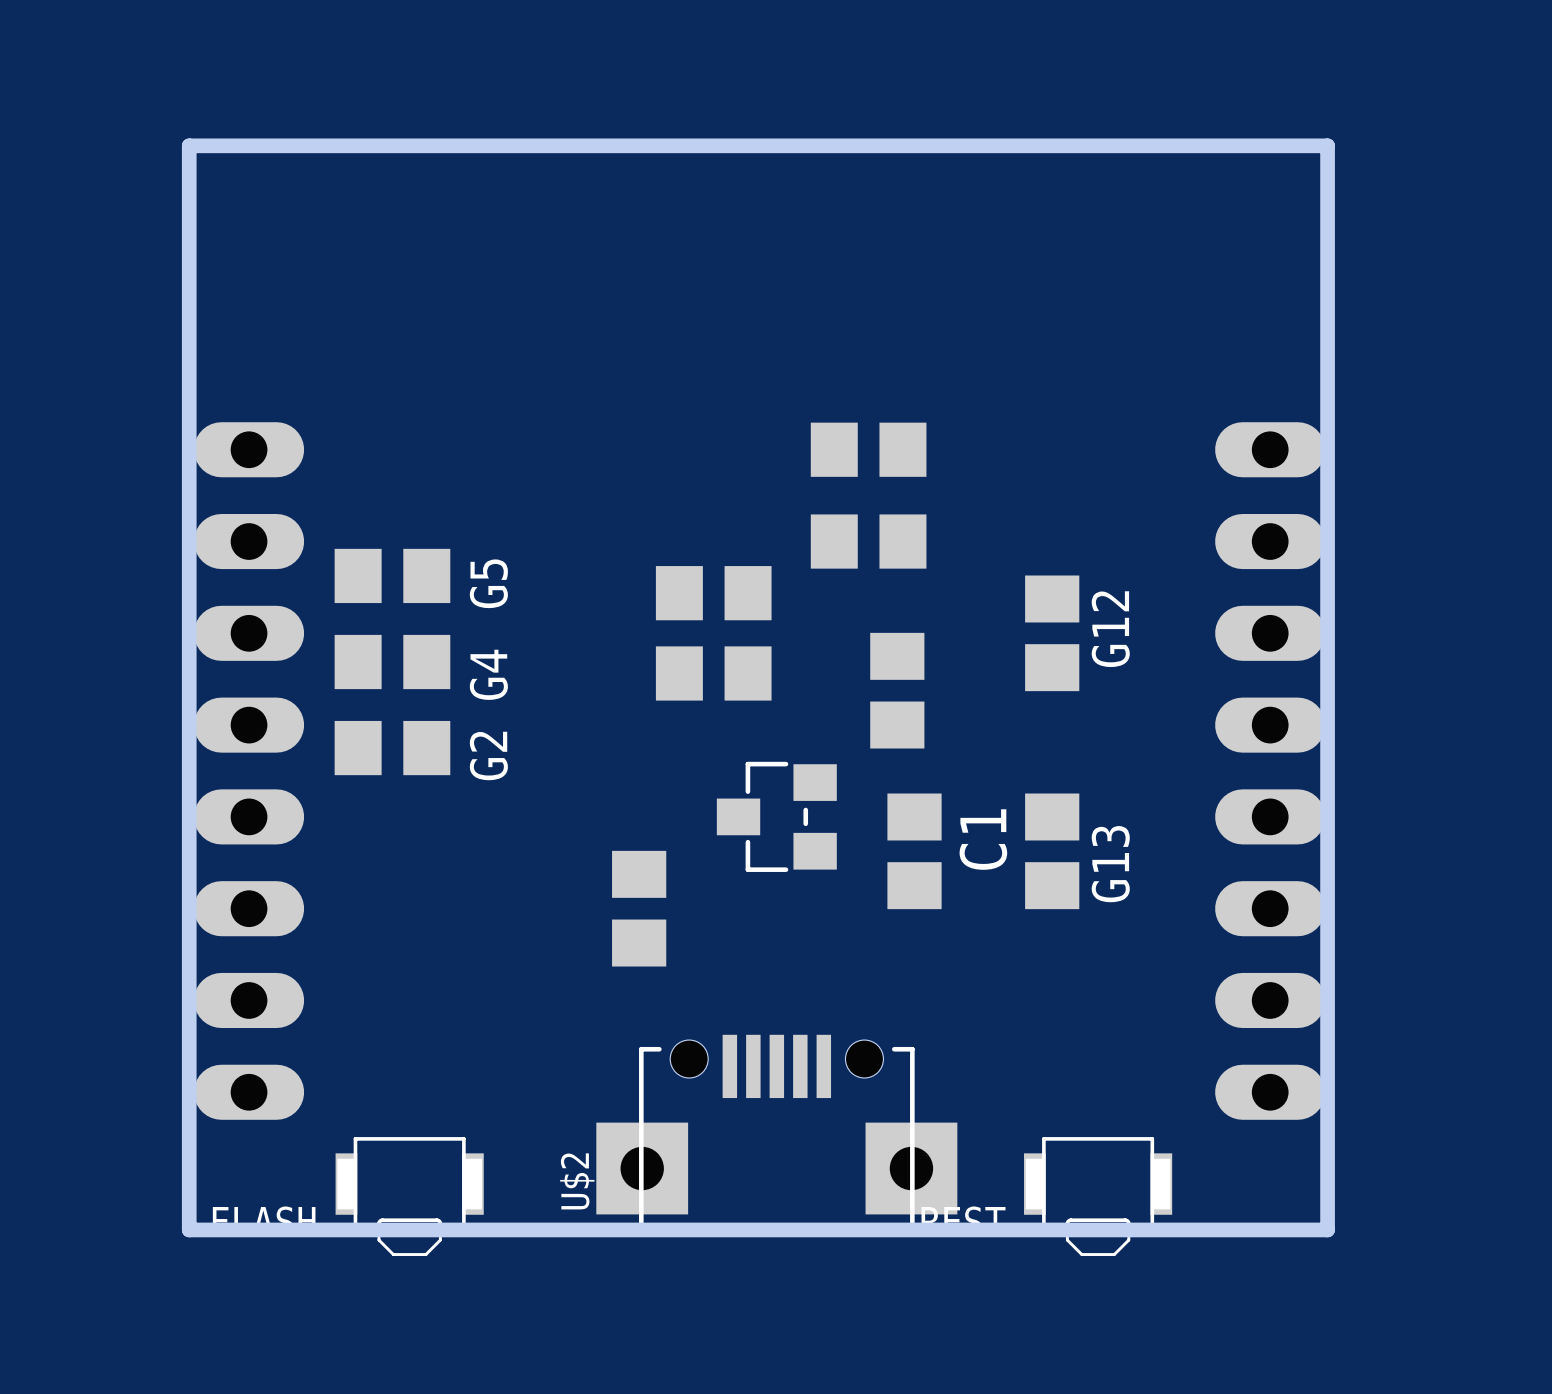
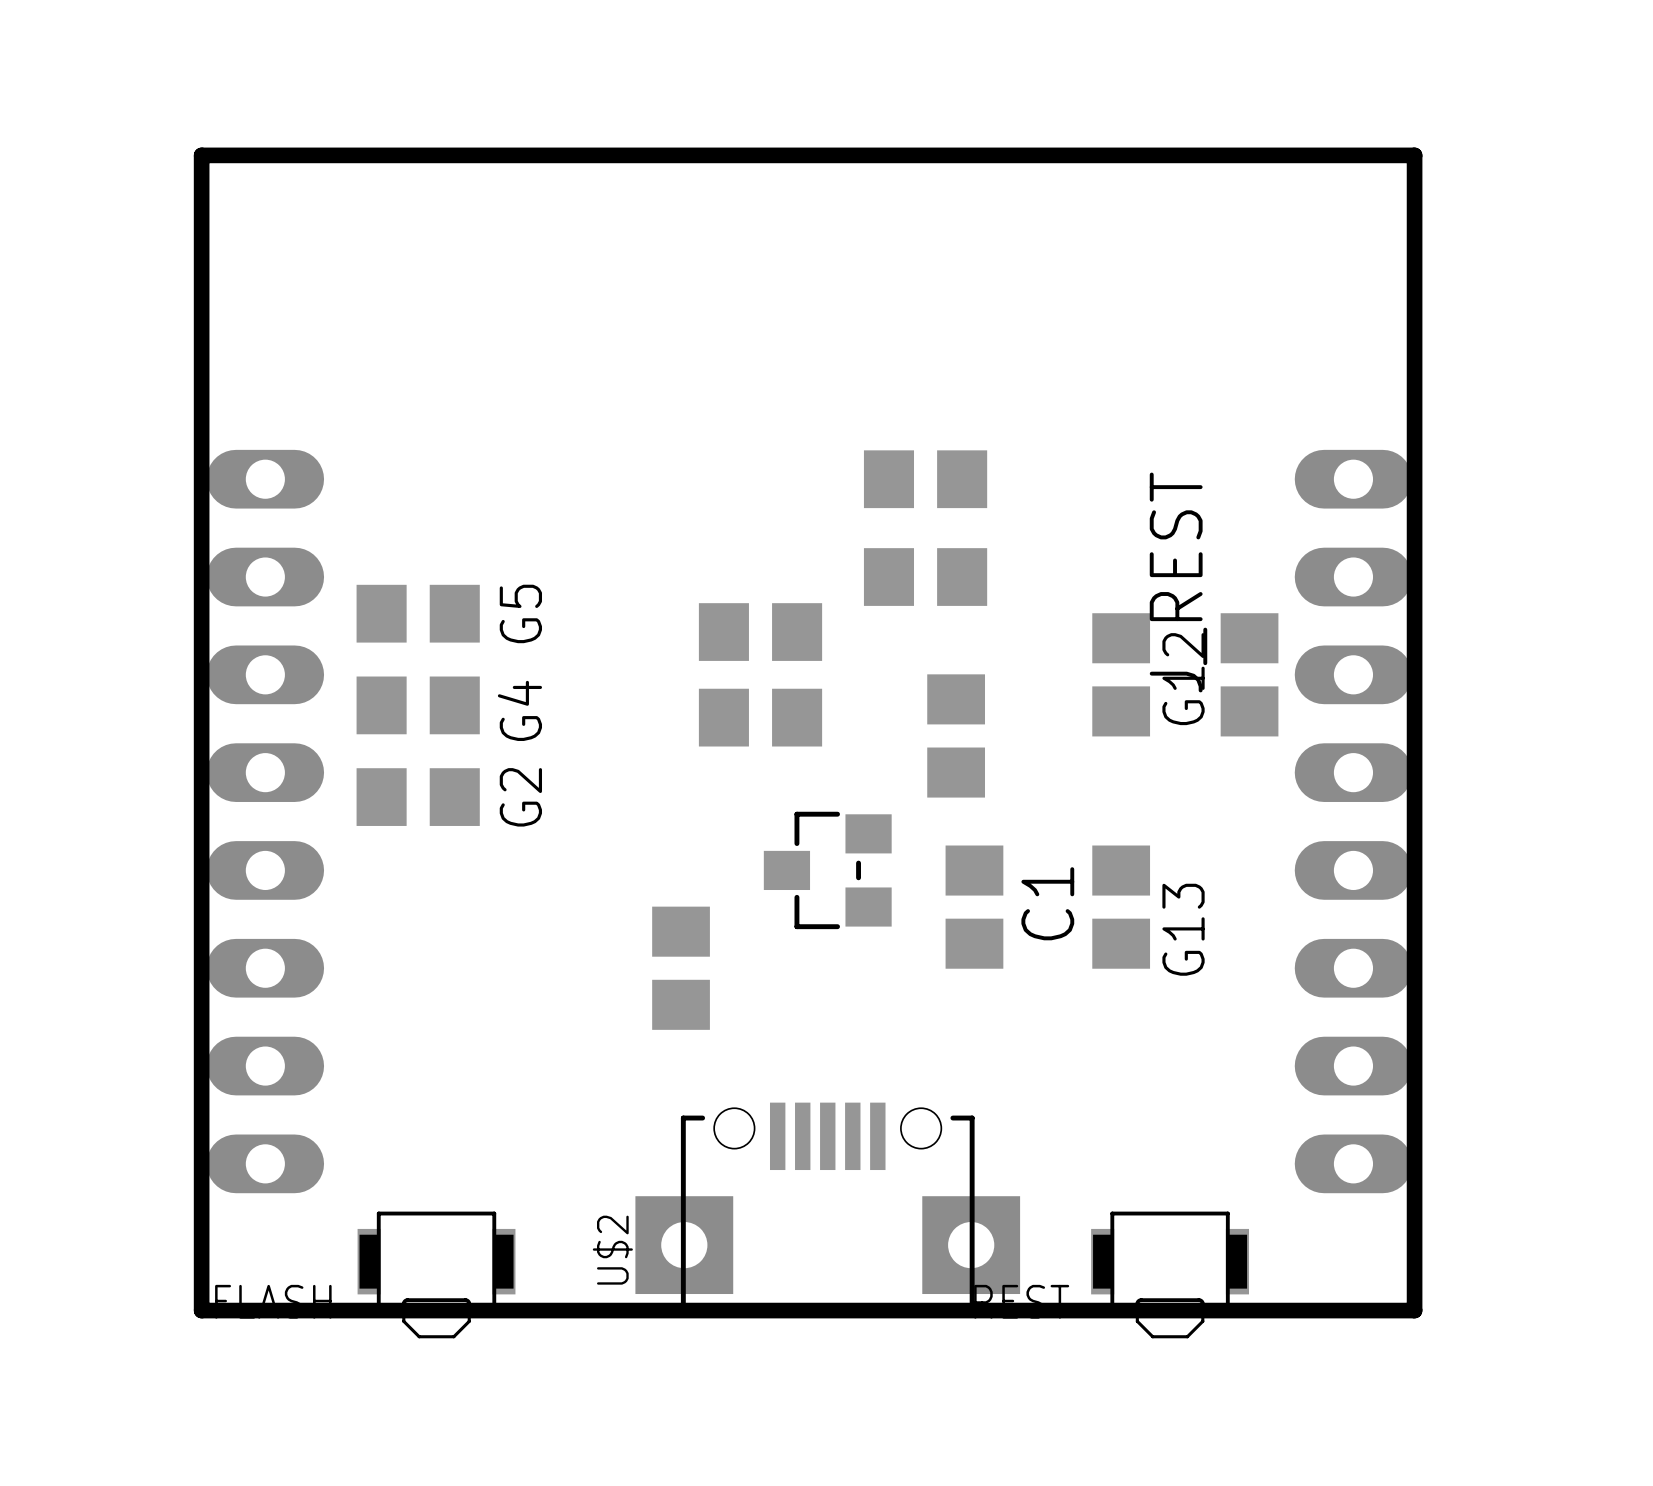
J_REST: none -> (1249, 674)

